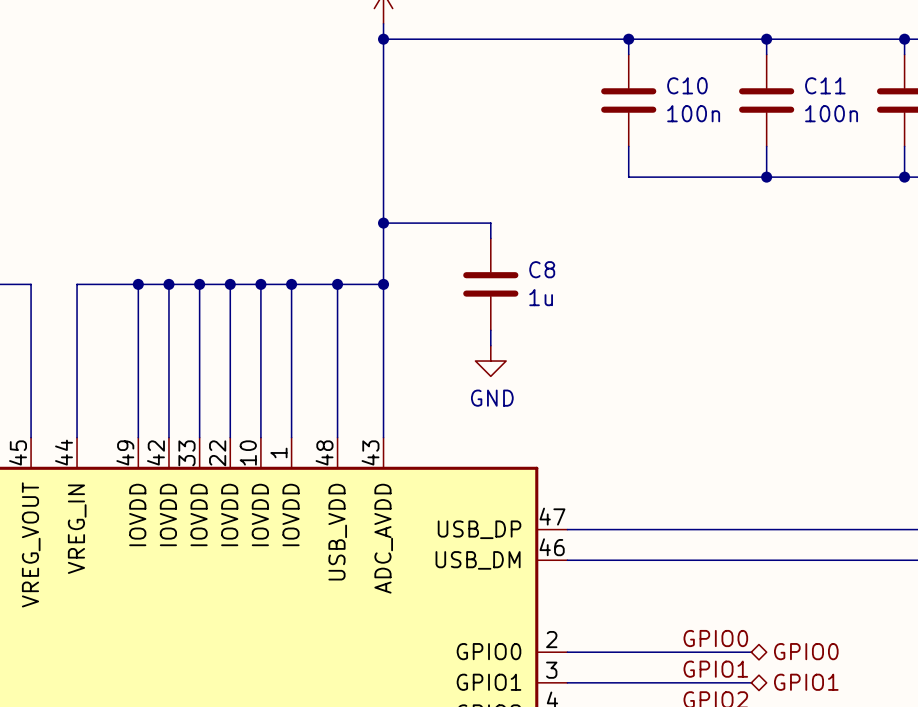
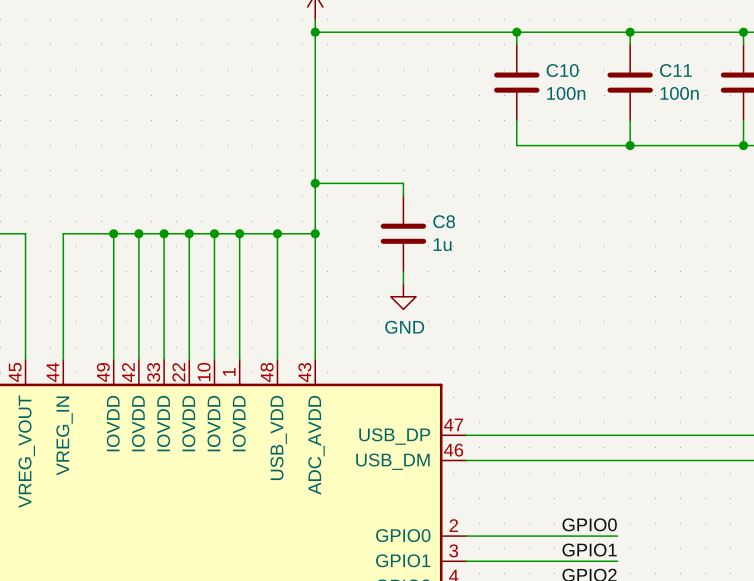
hierarchical label: GPIO0 (806, 651) -> none
hierarchical label: GPIO1 (806, 682) -> none

